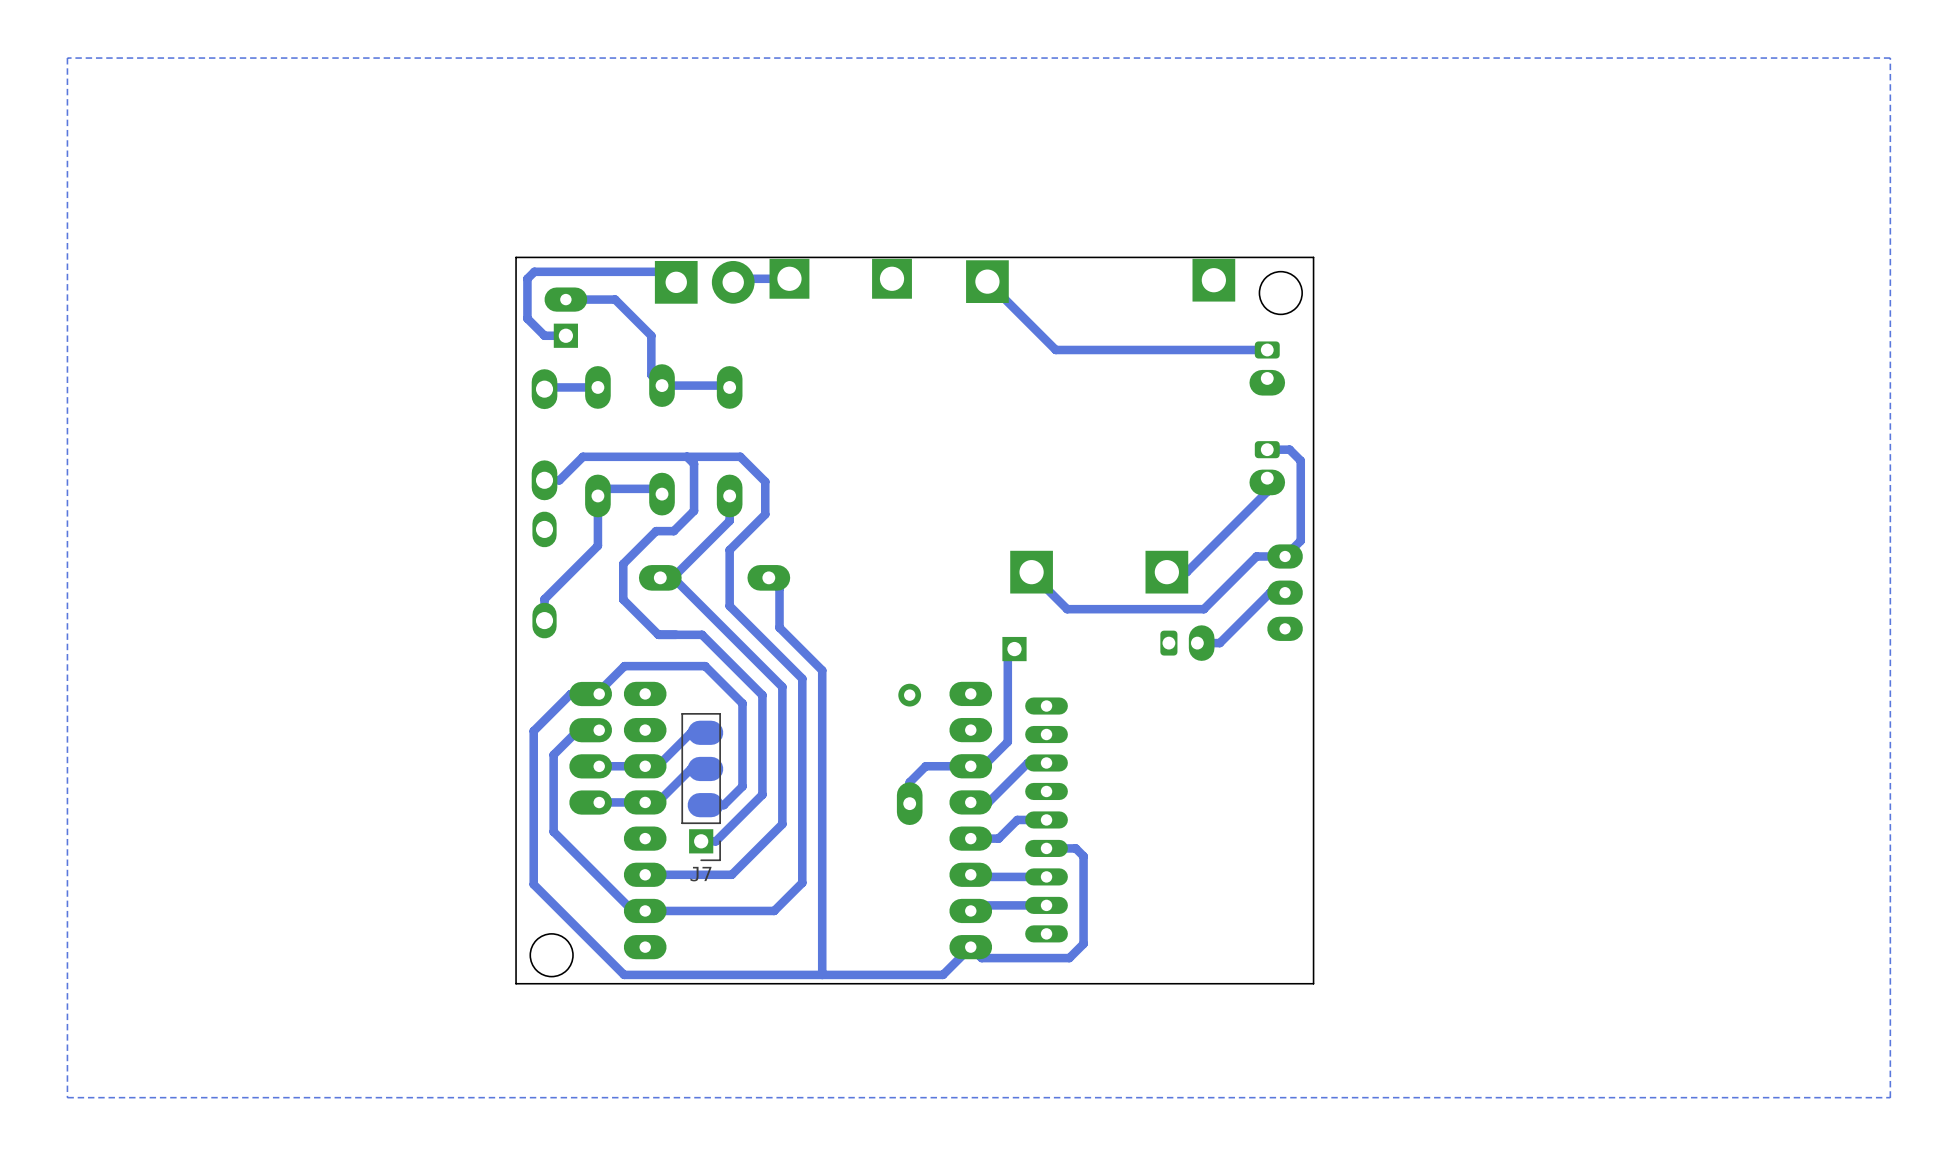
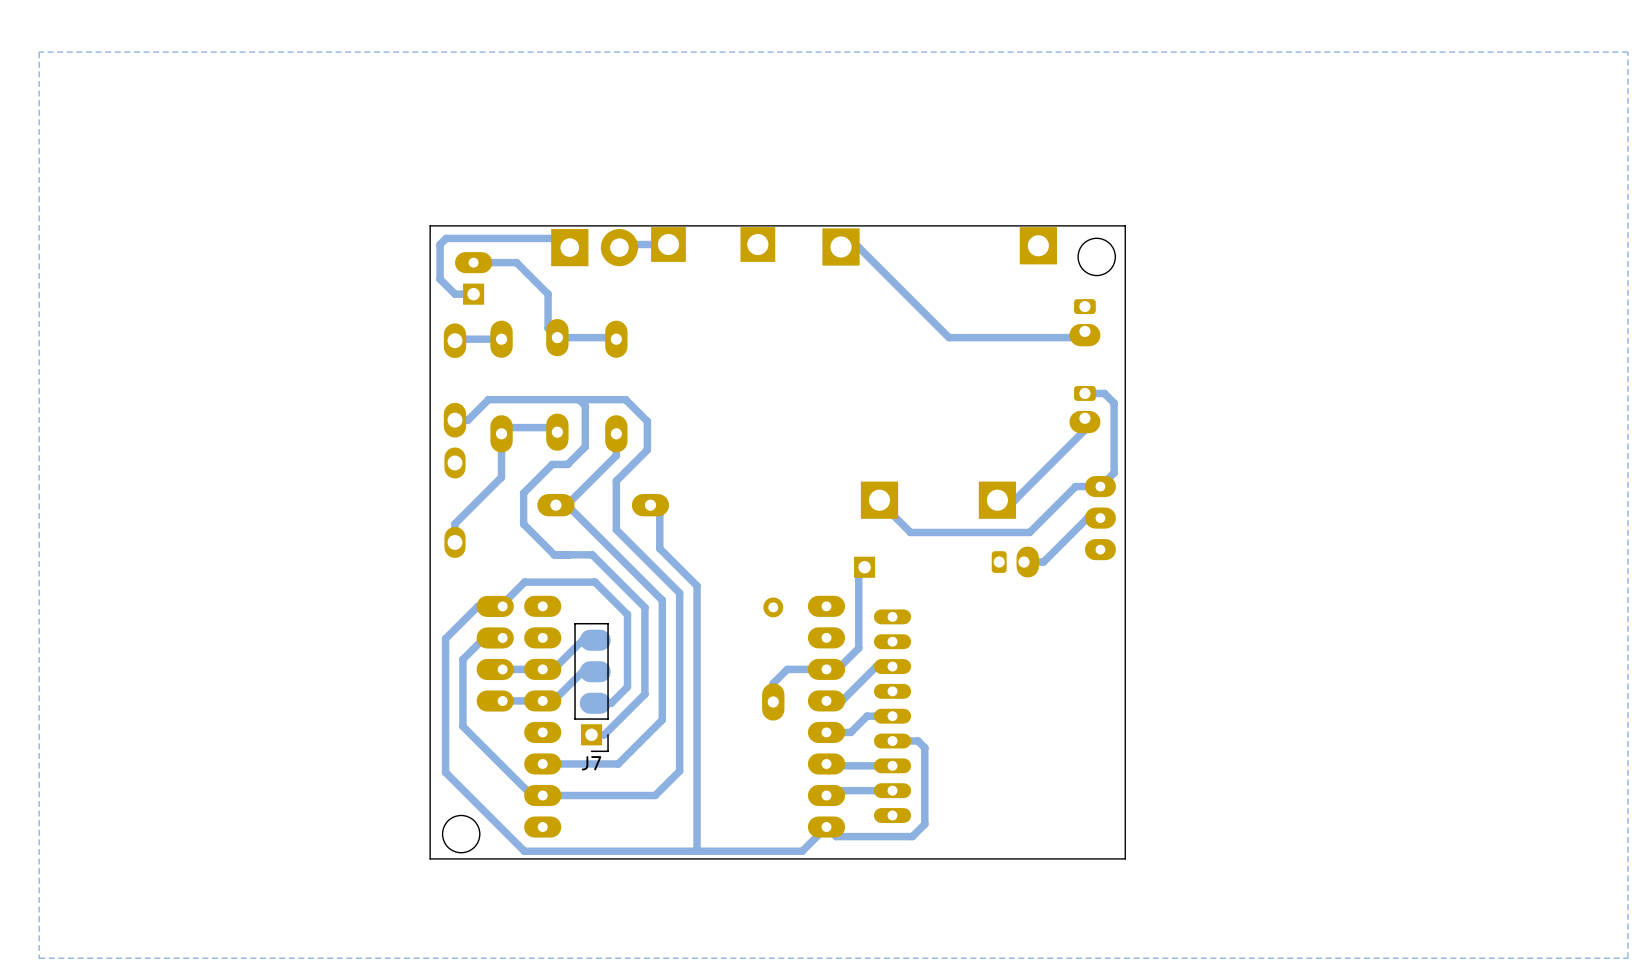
bottom track: (987, 281) (1055, 349) (1267, 349) -> (841, 246) (858, 246) (949, 337) (1078, 337) (1084, 331)

